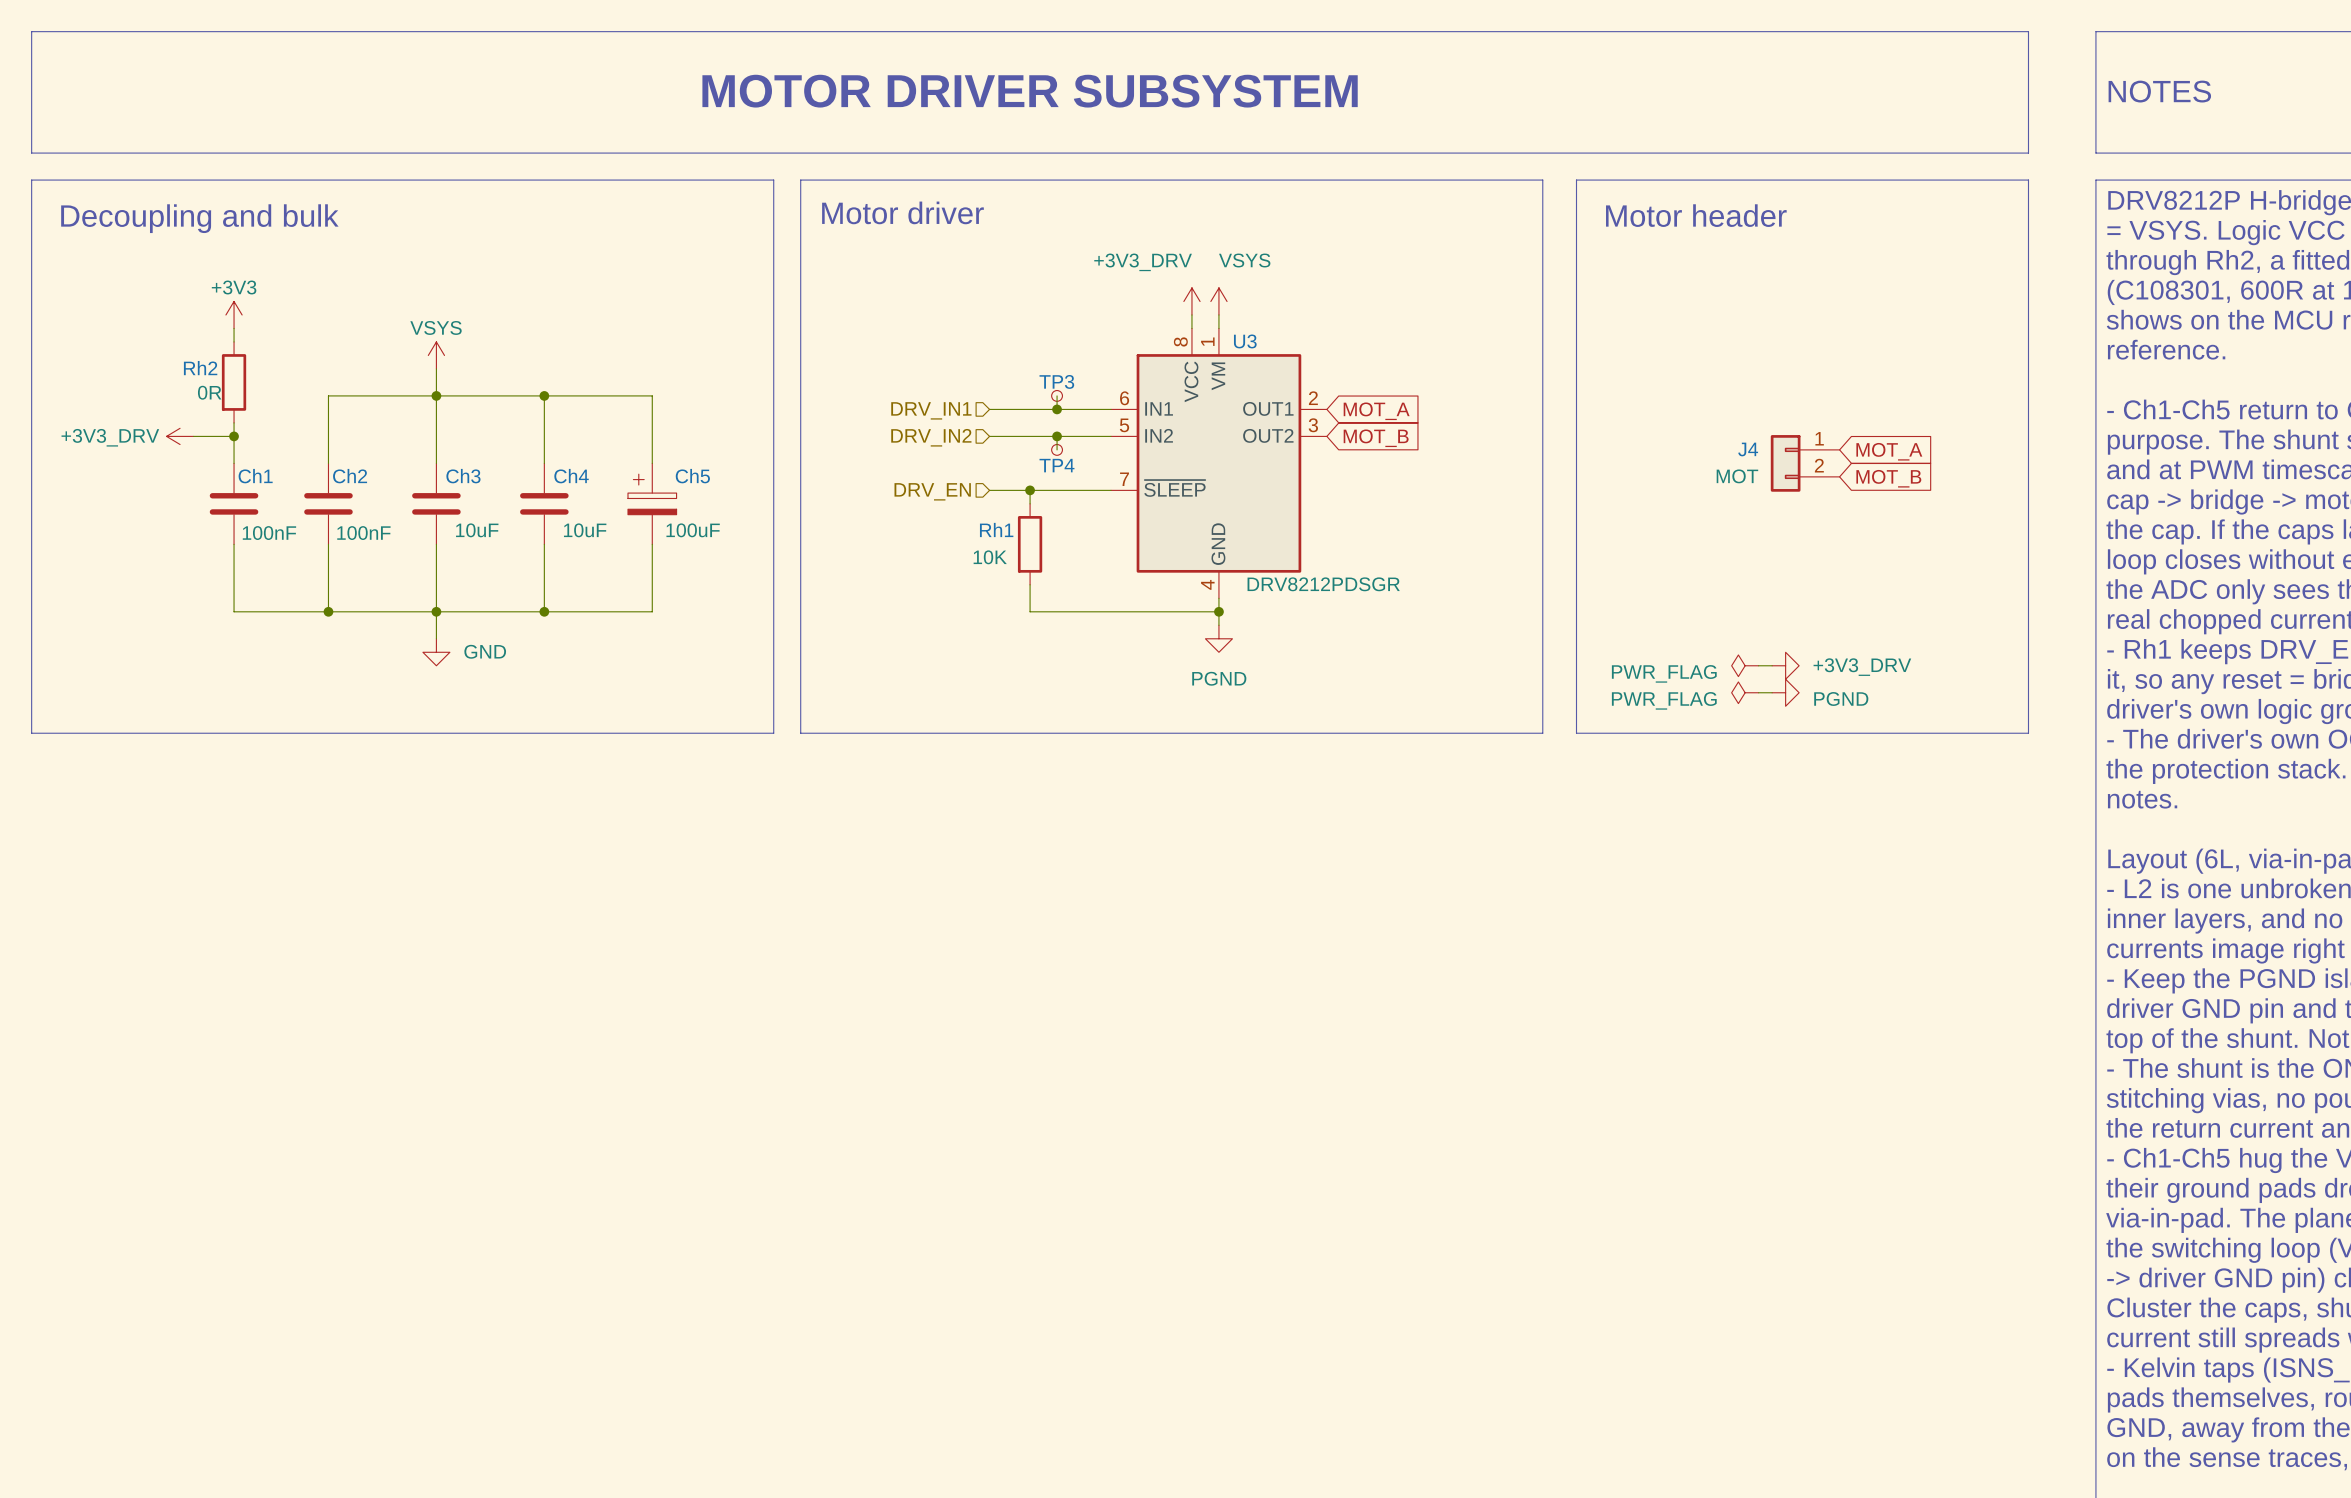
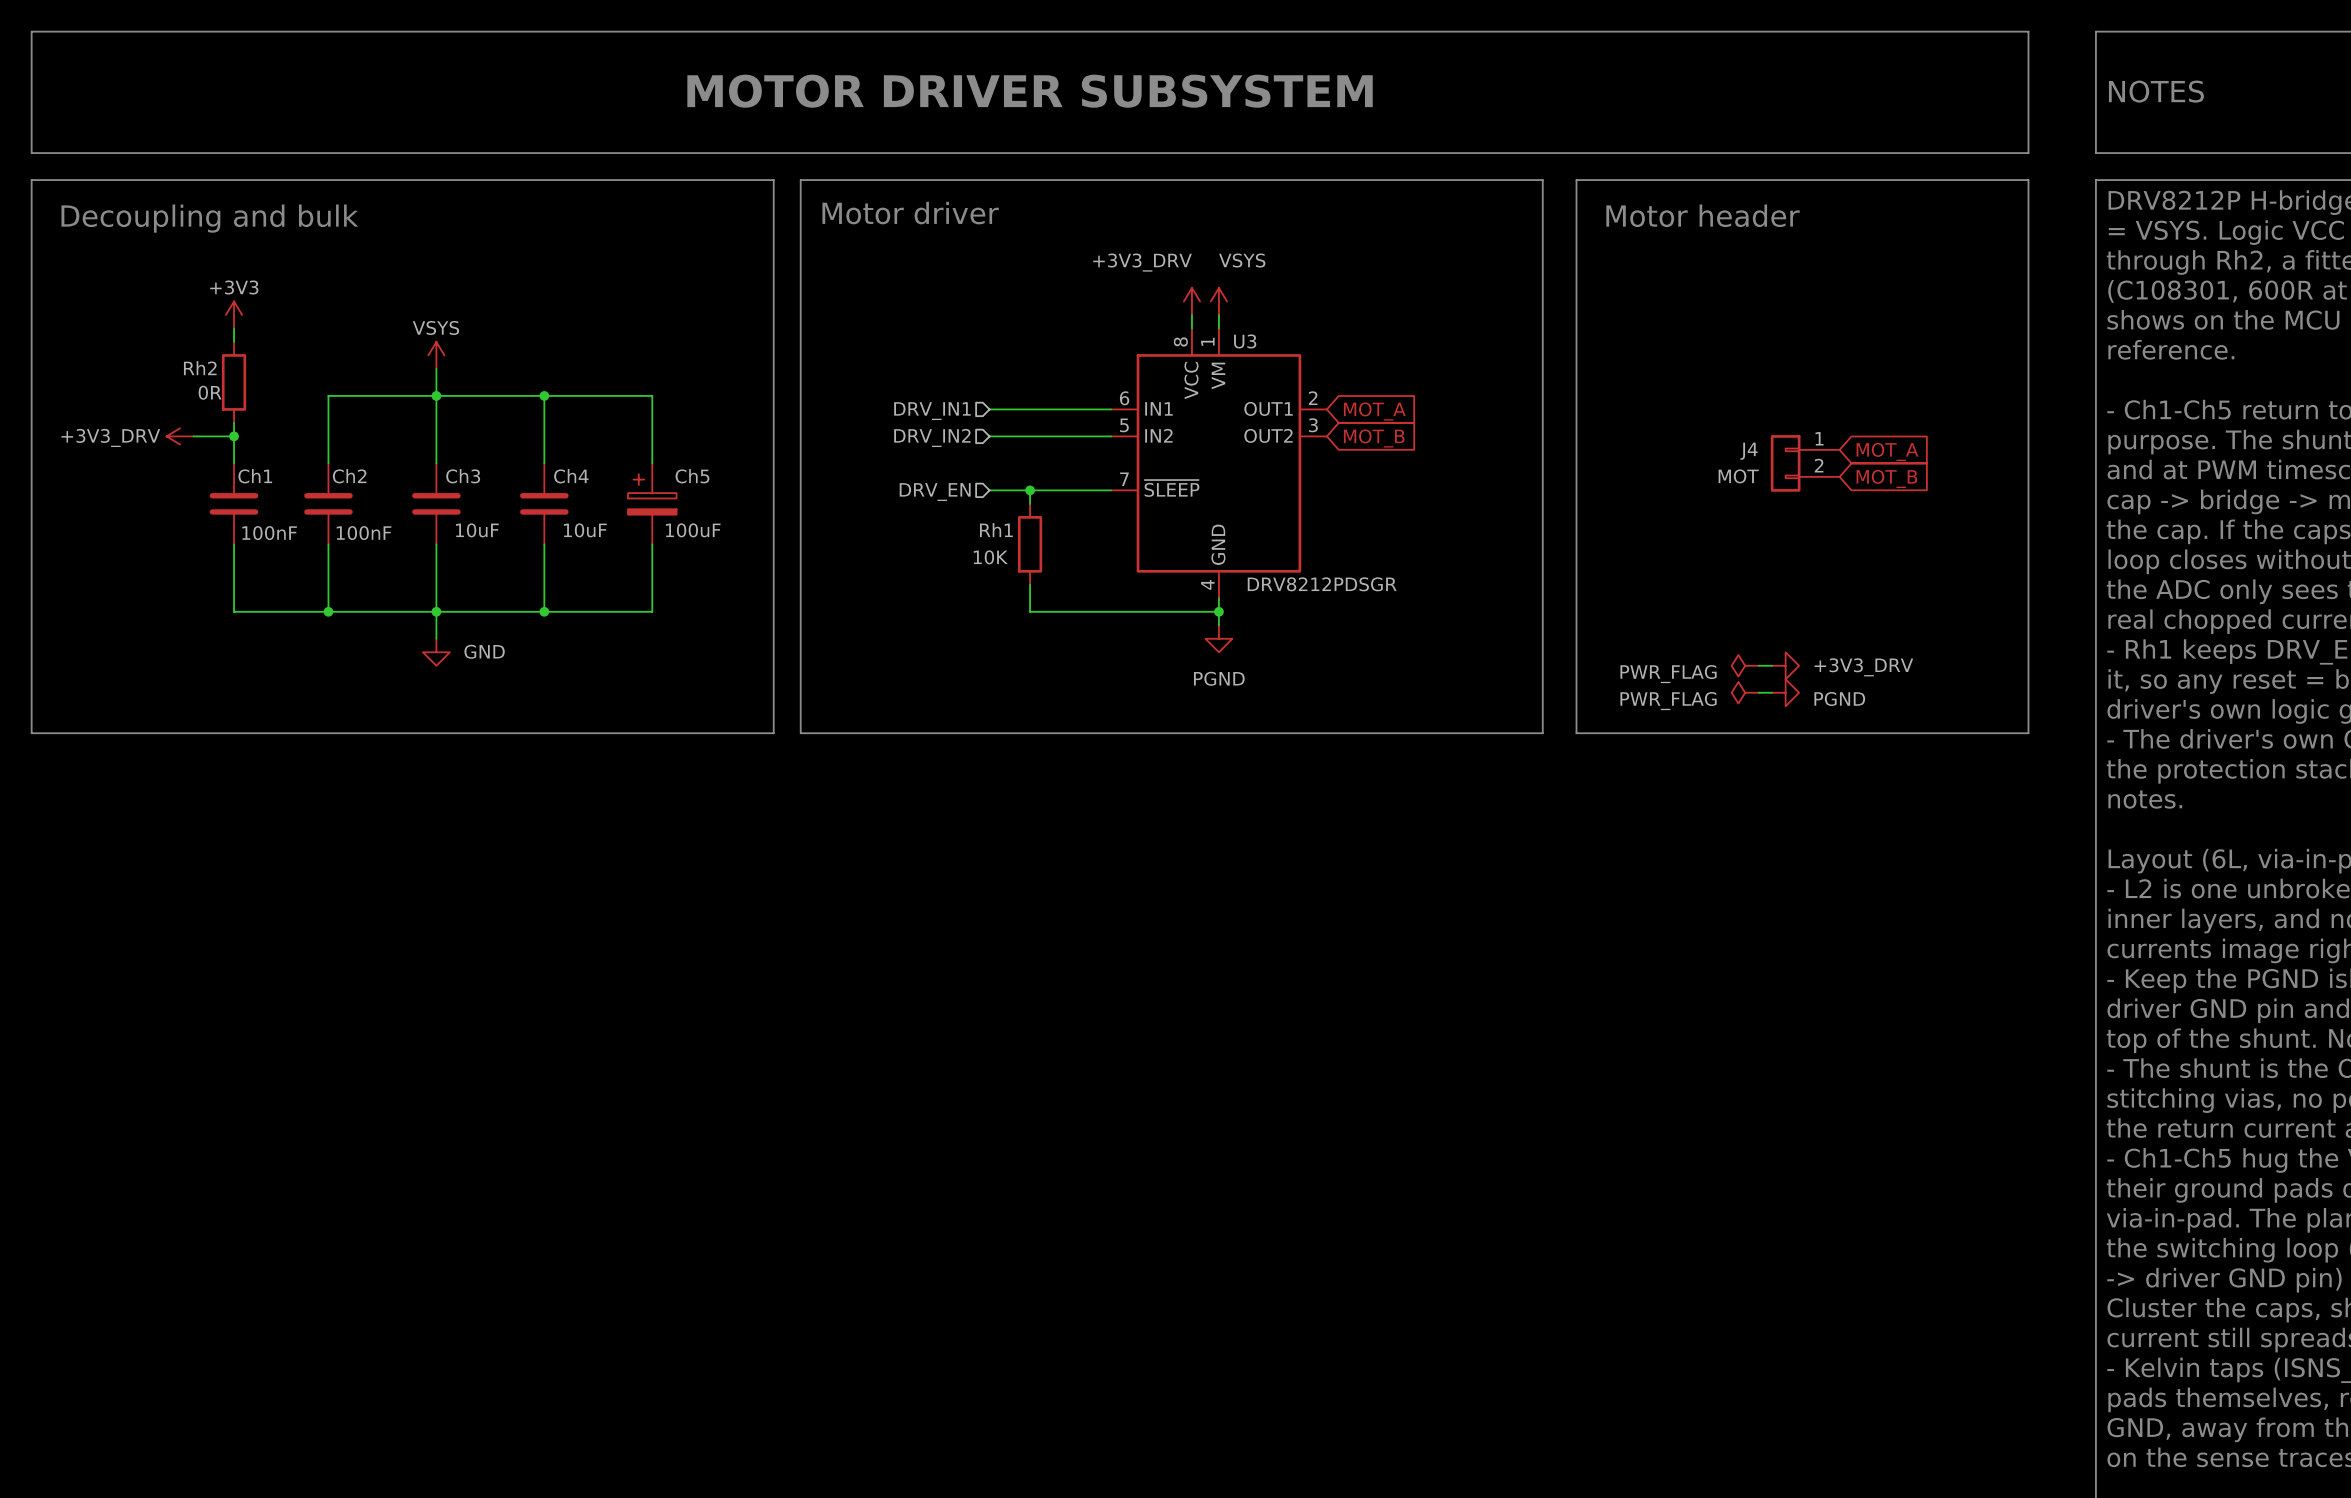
wire: (1057, 395) (1057, 409) -> none
TP3: (1057, 395) -> none
junction: (1057, 409) -> none
wire: (1057, 436) (1057, 449) -> none
junction: (1057, 436) -> none
TP4: (1057, 449) -> none

